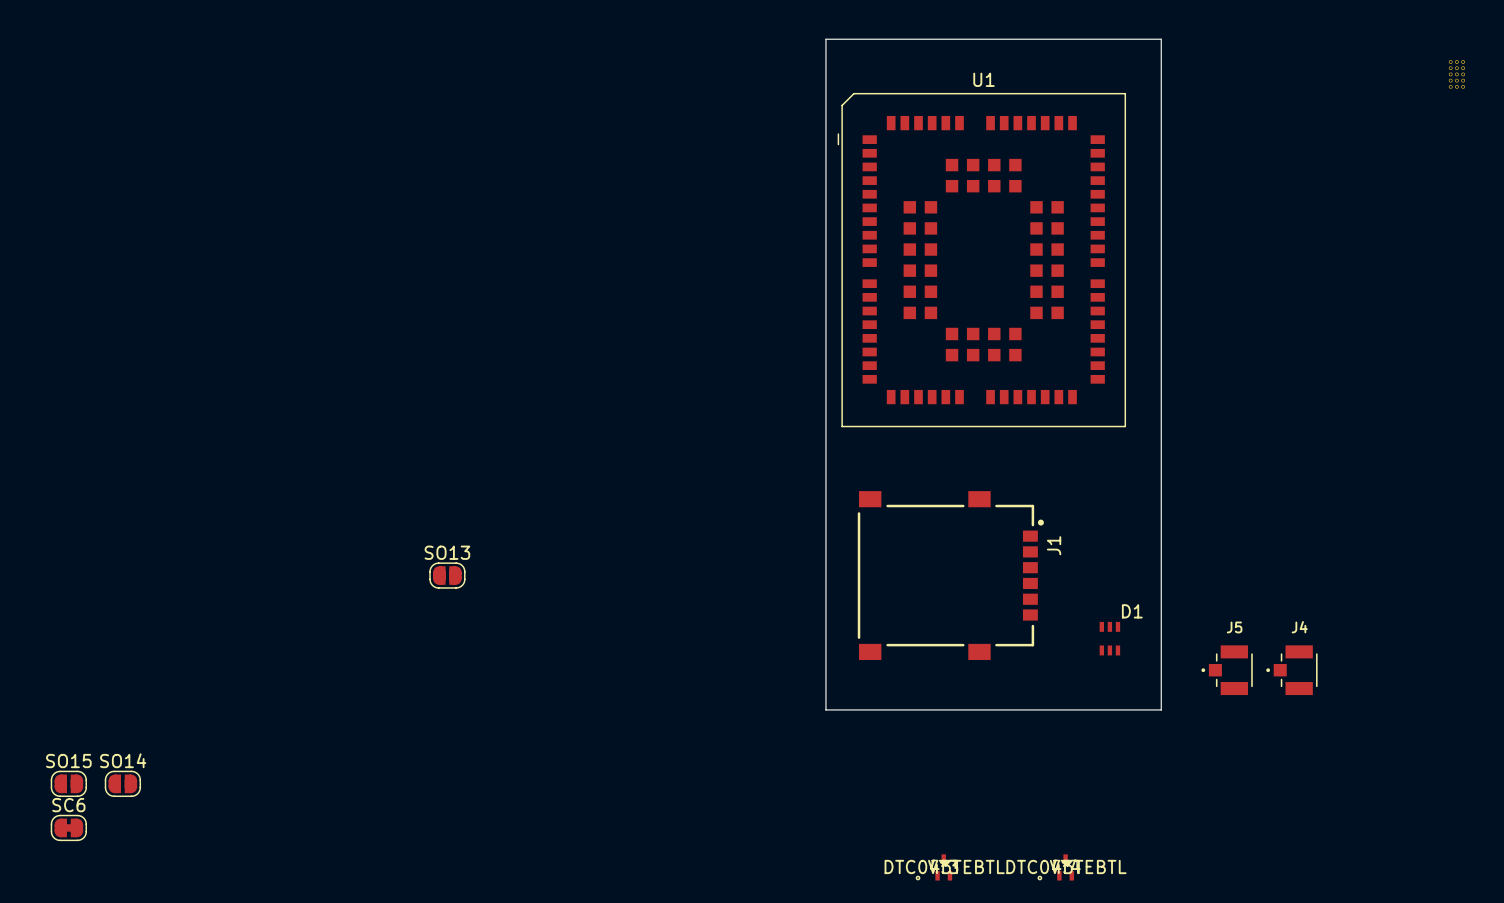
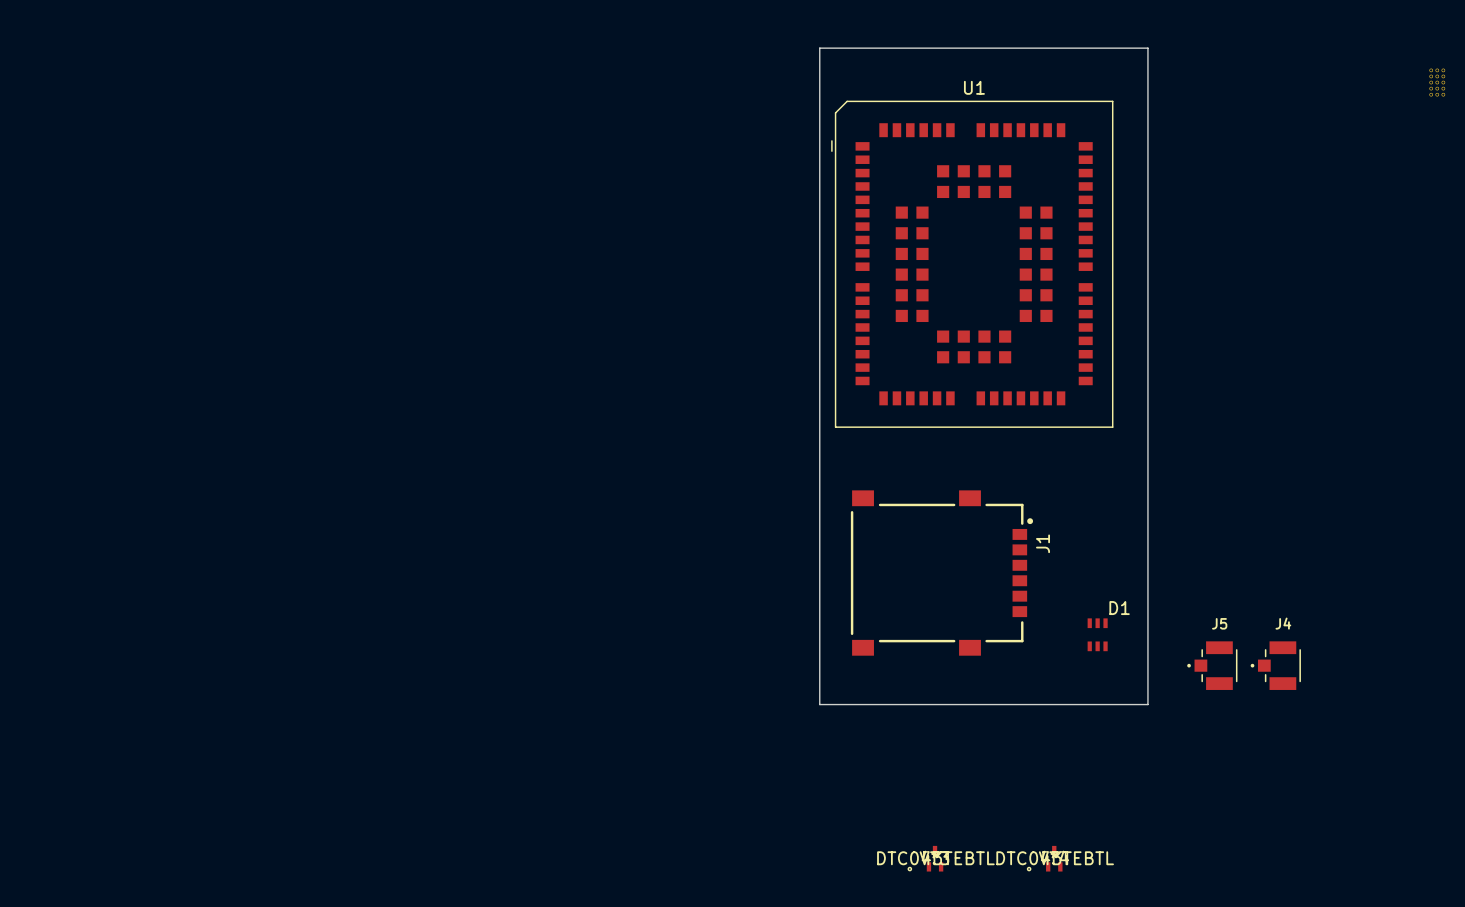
SO13: (447, 575) -> none
SO15: (68, 783) -> none
SO14: (122, 783) -> none
SC6: (68, 827) -> none

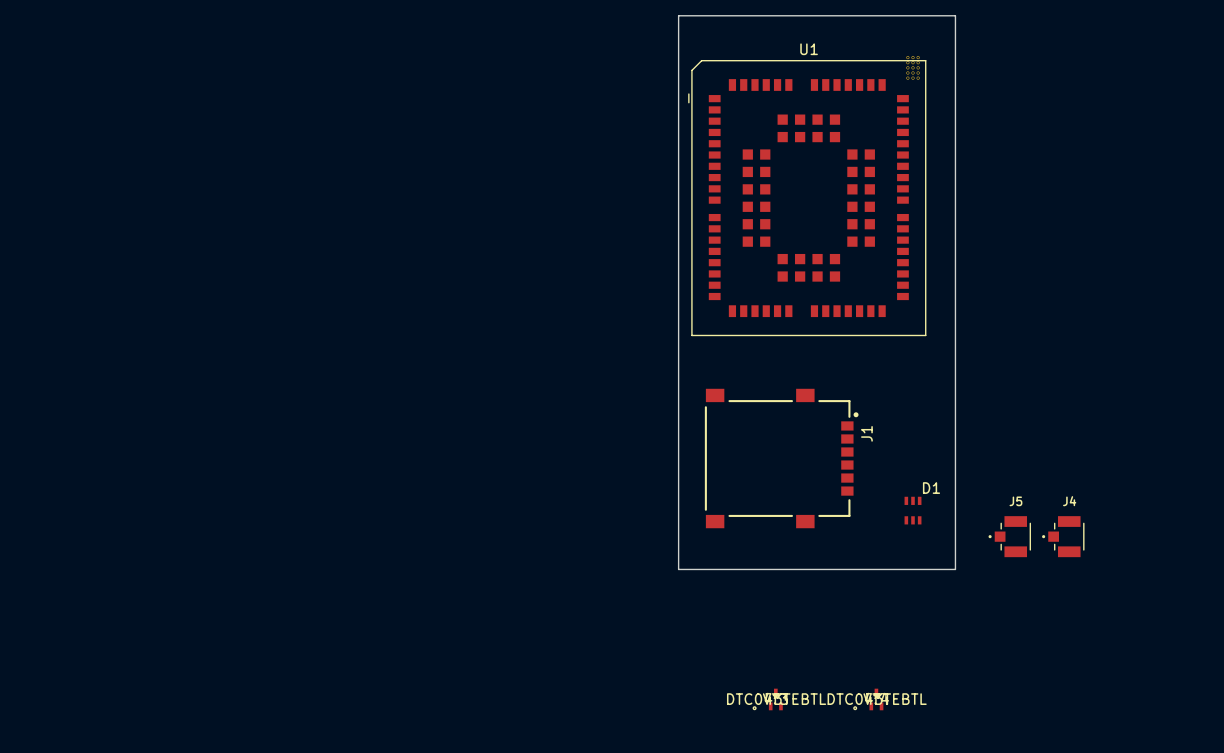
part: (1437, 82) -> none
part: none -> (913, 67)

